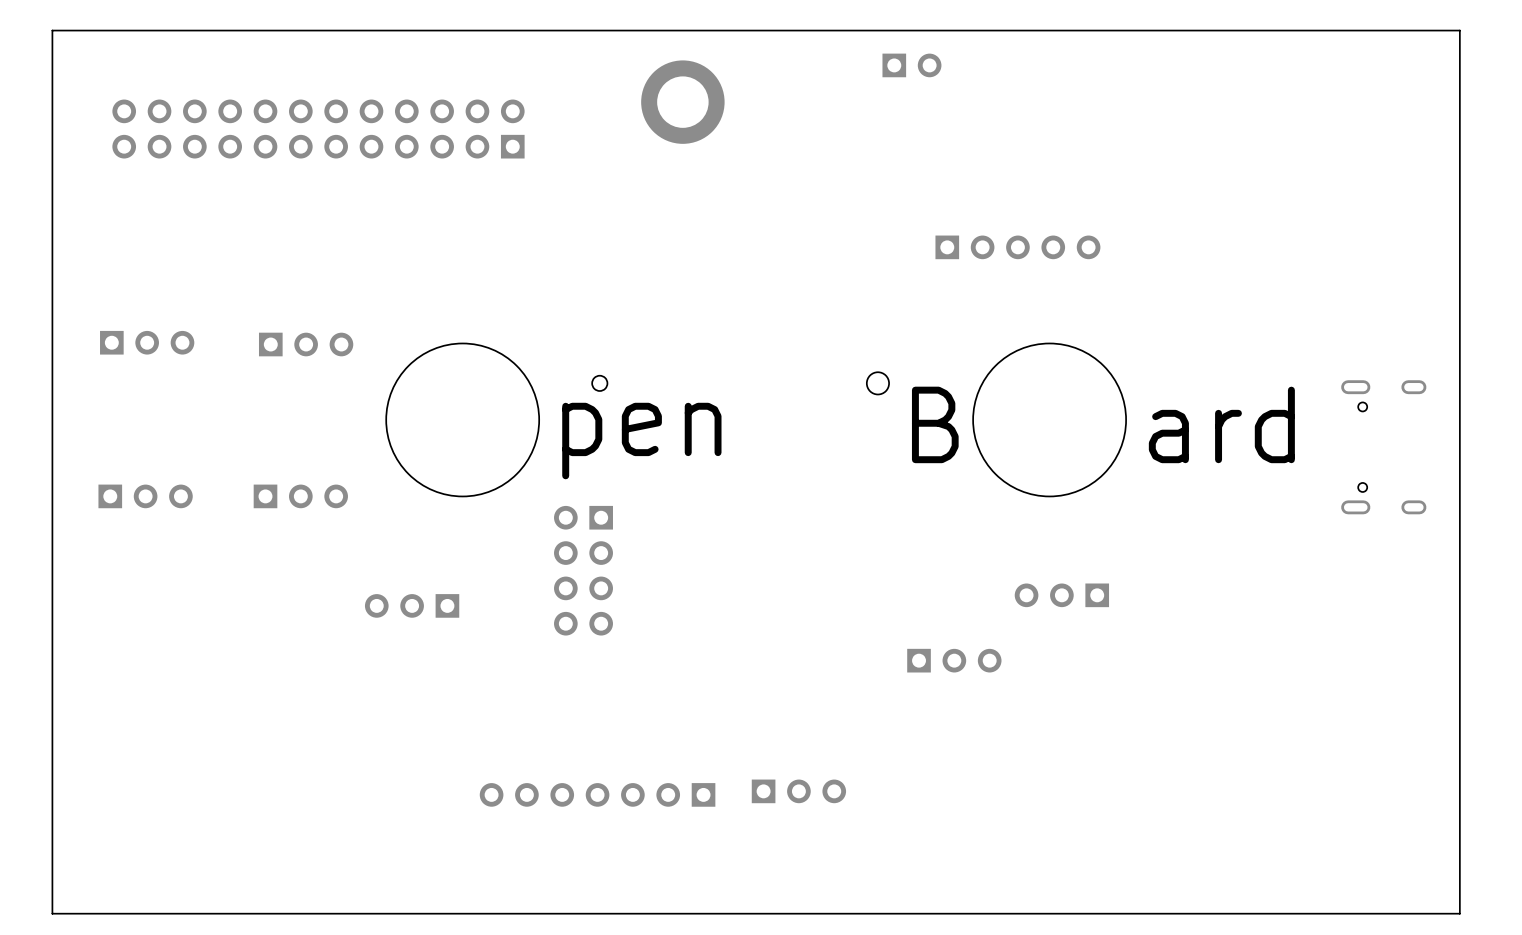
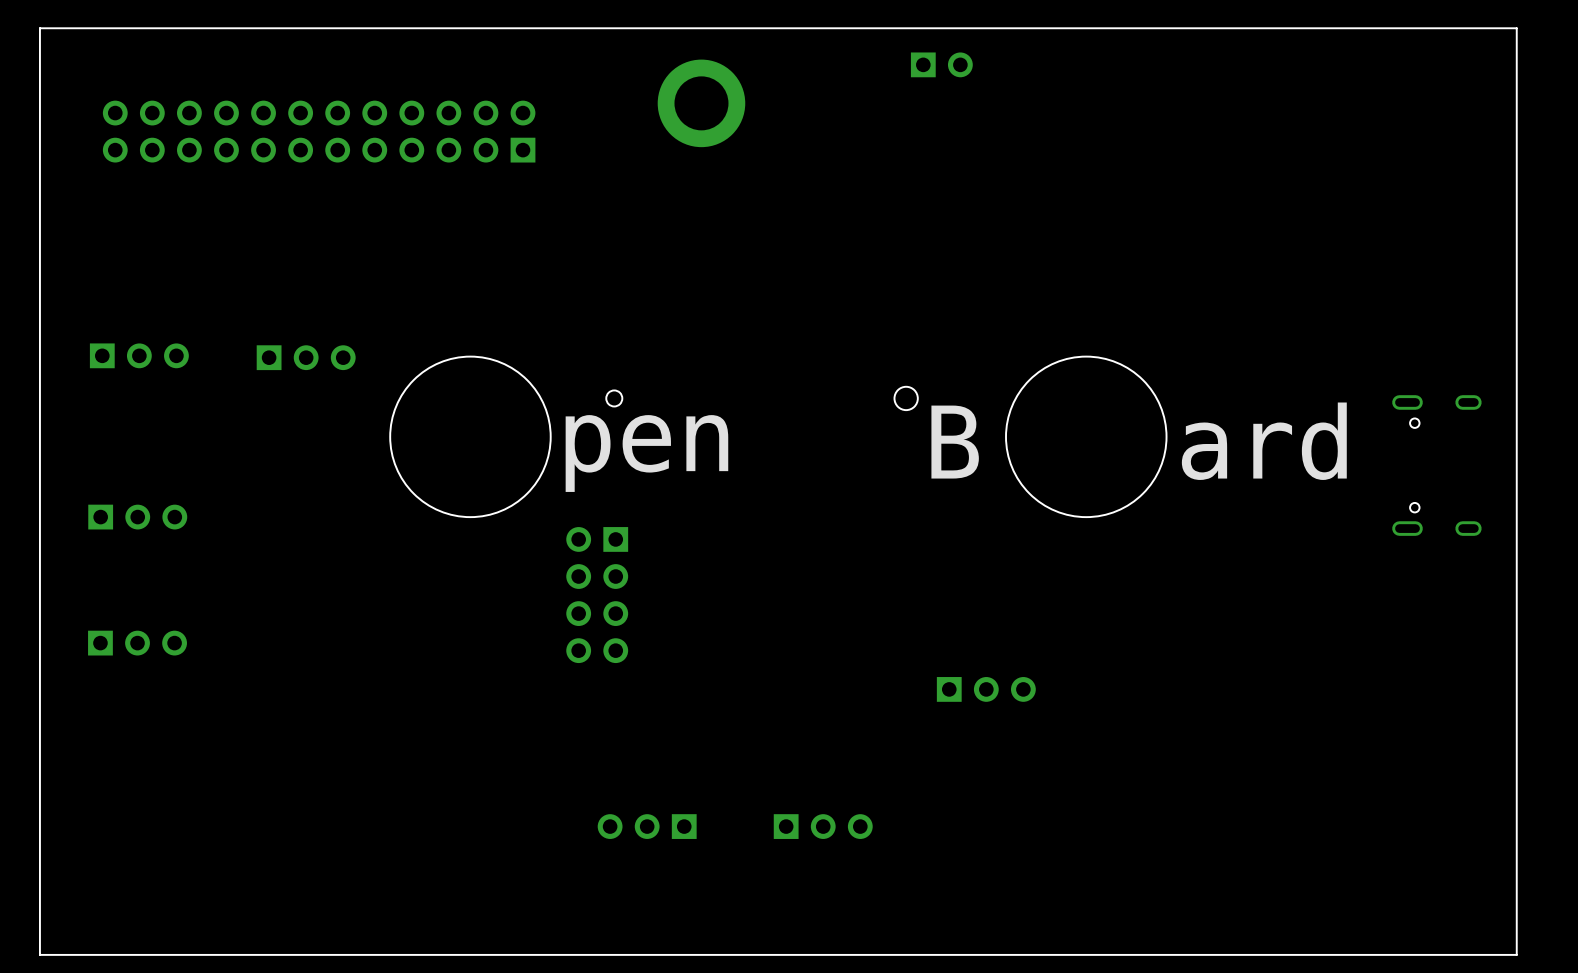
part: (1017, 247) -> none
part: (300, 496) -> none
part: (1061, 595) -> none
part: (412, 605) -> none
part: none -> (137, 643)
part: none -> (647, 826)
part: (597, 794) -> none

